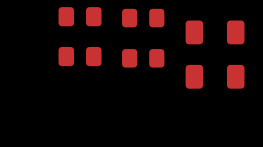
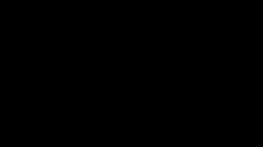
part: (80, 16) -> none
part: (143, 18) -> none
part: (215, 32) -> none
part: (80, 56) -> none
part: (143, 58) -> none
part: (215, 76) -> none

